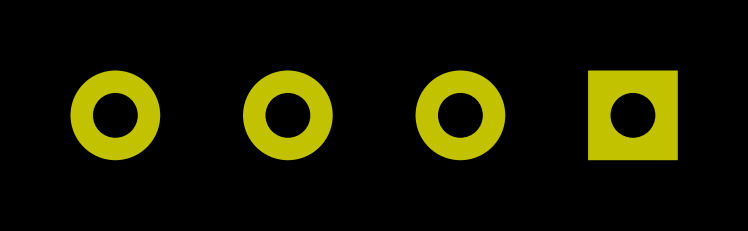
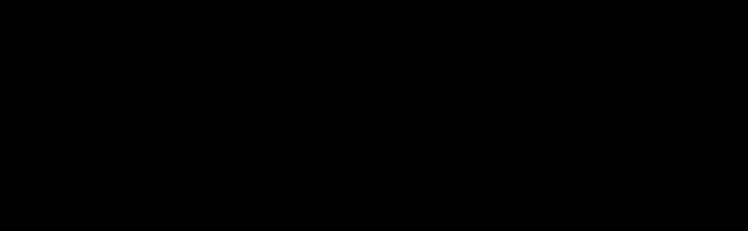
part: (374, 115) -> none

